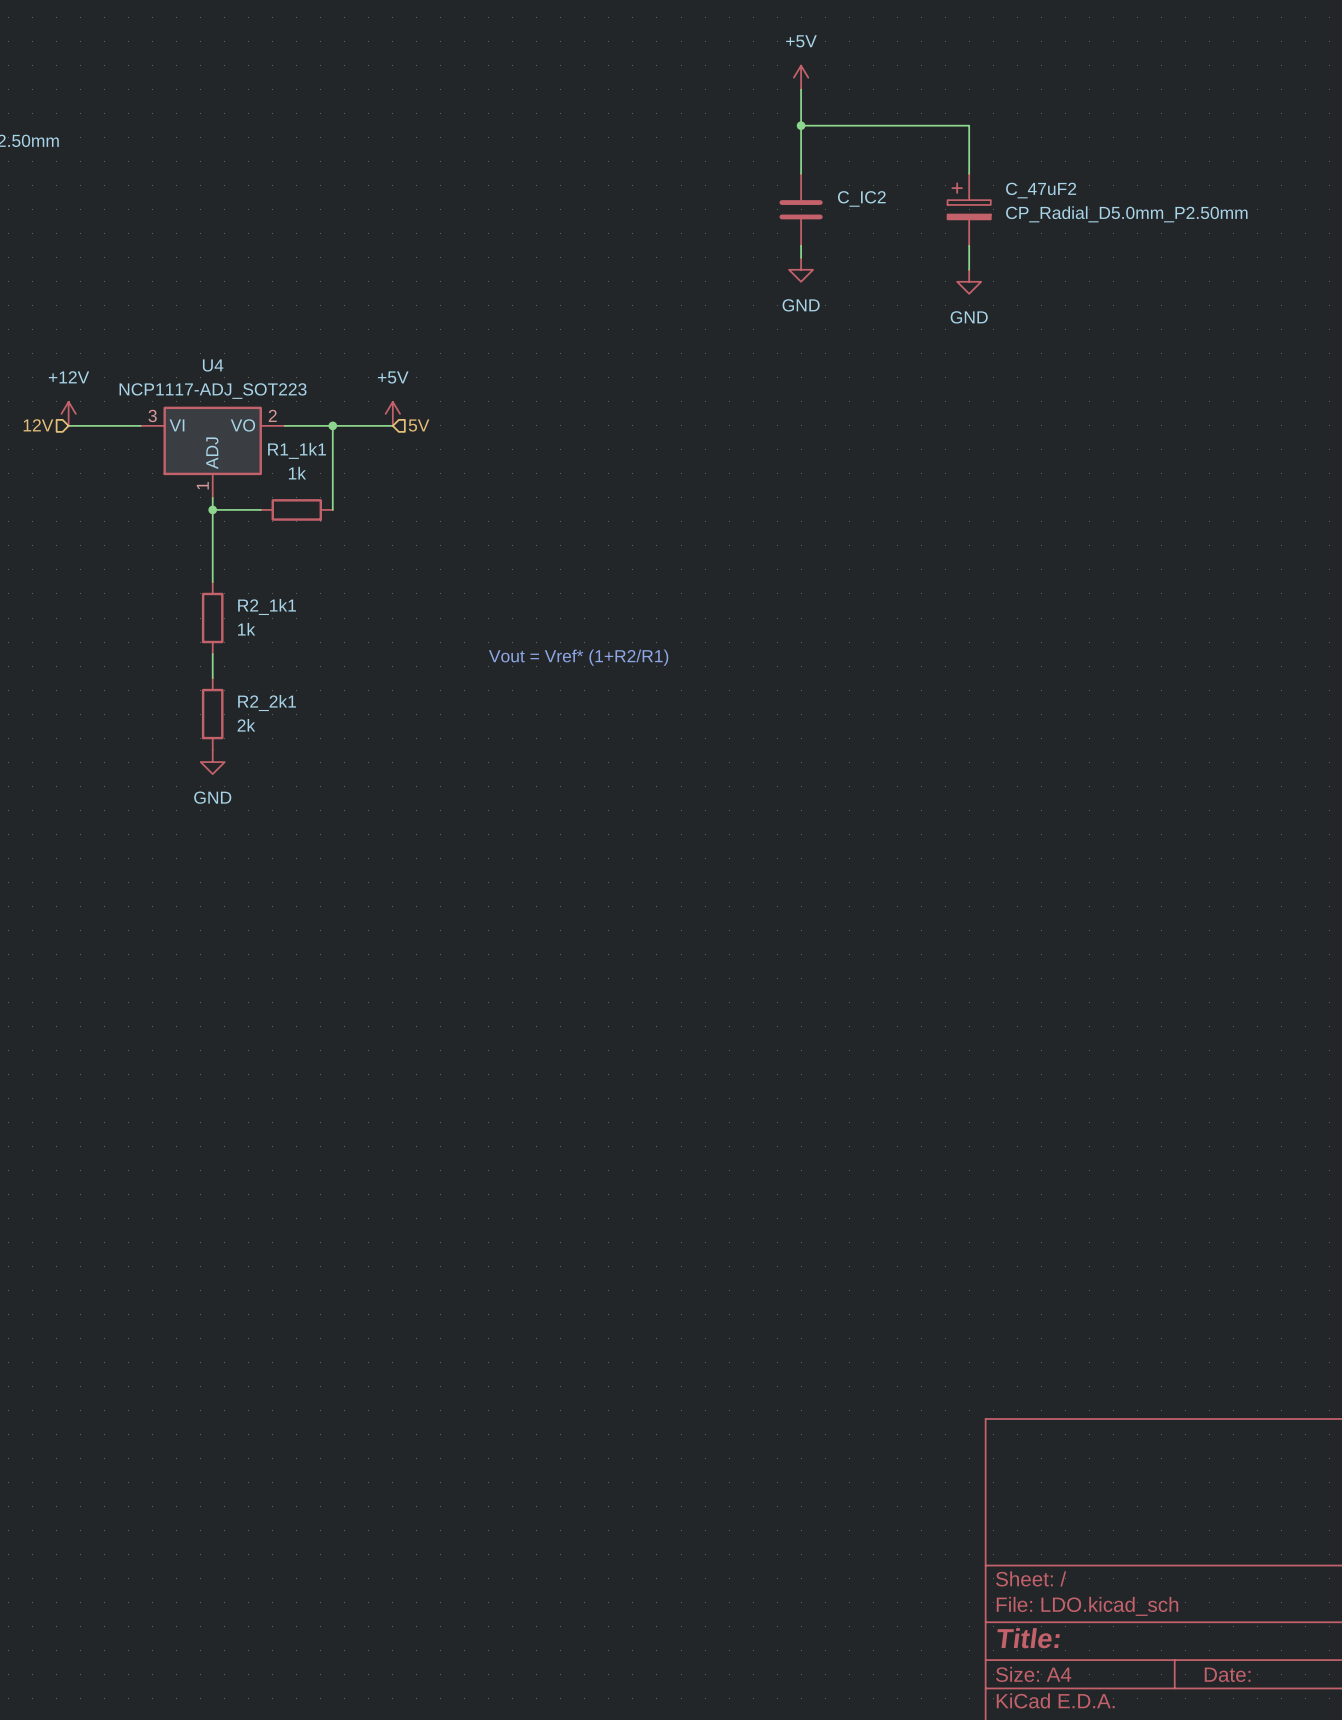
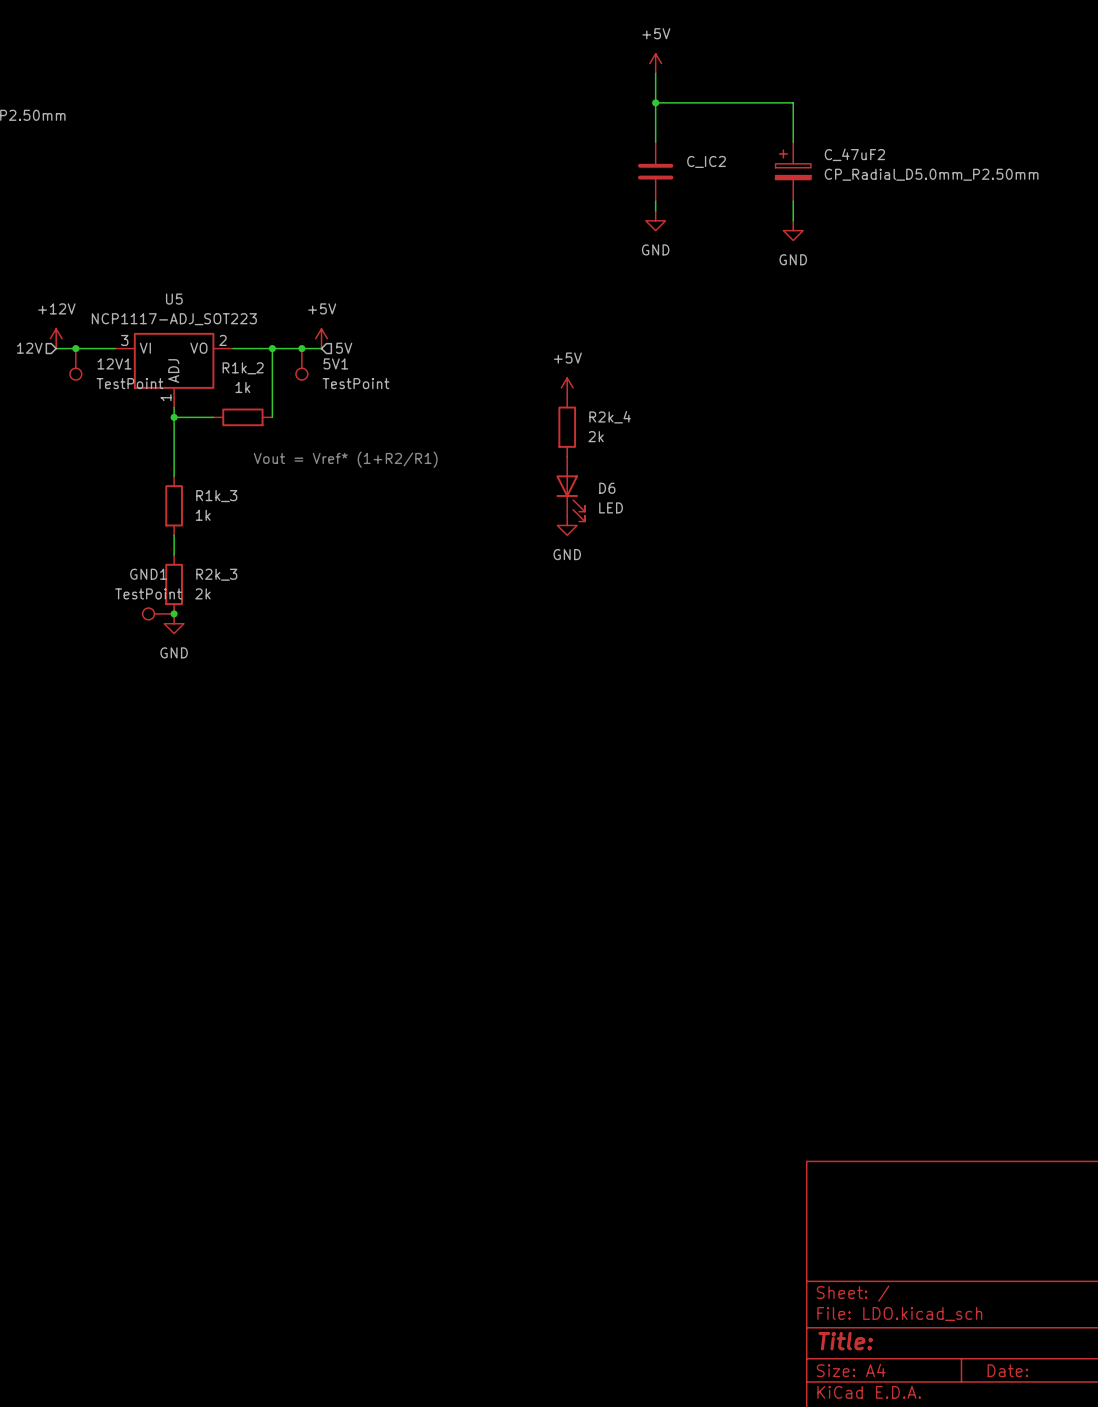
U4 name: U4 (213, 365) -> U5 (174, 299)
junction: none -> (75, 348)
junction: none -> (301, 348)
12V1: none -> TestPoint (75, 364)
5V1: none -> TestPoint (301, 364)
R1_1k1 name: R1_1k1 (297, 450) -> R1k_2 (243, 368)
power symbol: none -> +5V (567, 387)
R2k_4: none -> 2k (567, 427)
D6: none -> LED (570, 489)
R2_1k1 name: R2_1k1 (267, 606) -> R1k_3 (216, 496)
power symbol: none -> GND (567, 525)
text position: Vout = Vref* (1+R2/R1) (578, 657) -> Vout = Vref* (1+R2/R1) (345, 459)
R2_2k1 name: R2_2k1 (267, 703) -> R2k_3 (216, 574)
GND1: none -> TestPoint (158, 613)
junction: none -> (174, 613)

